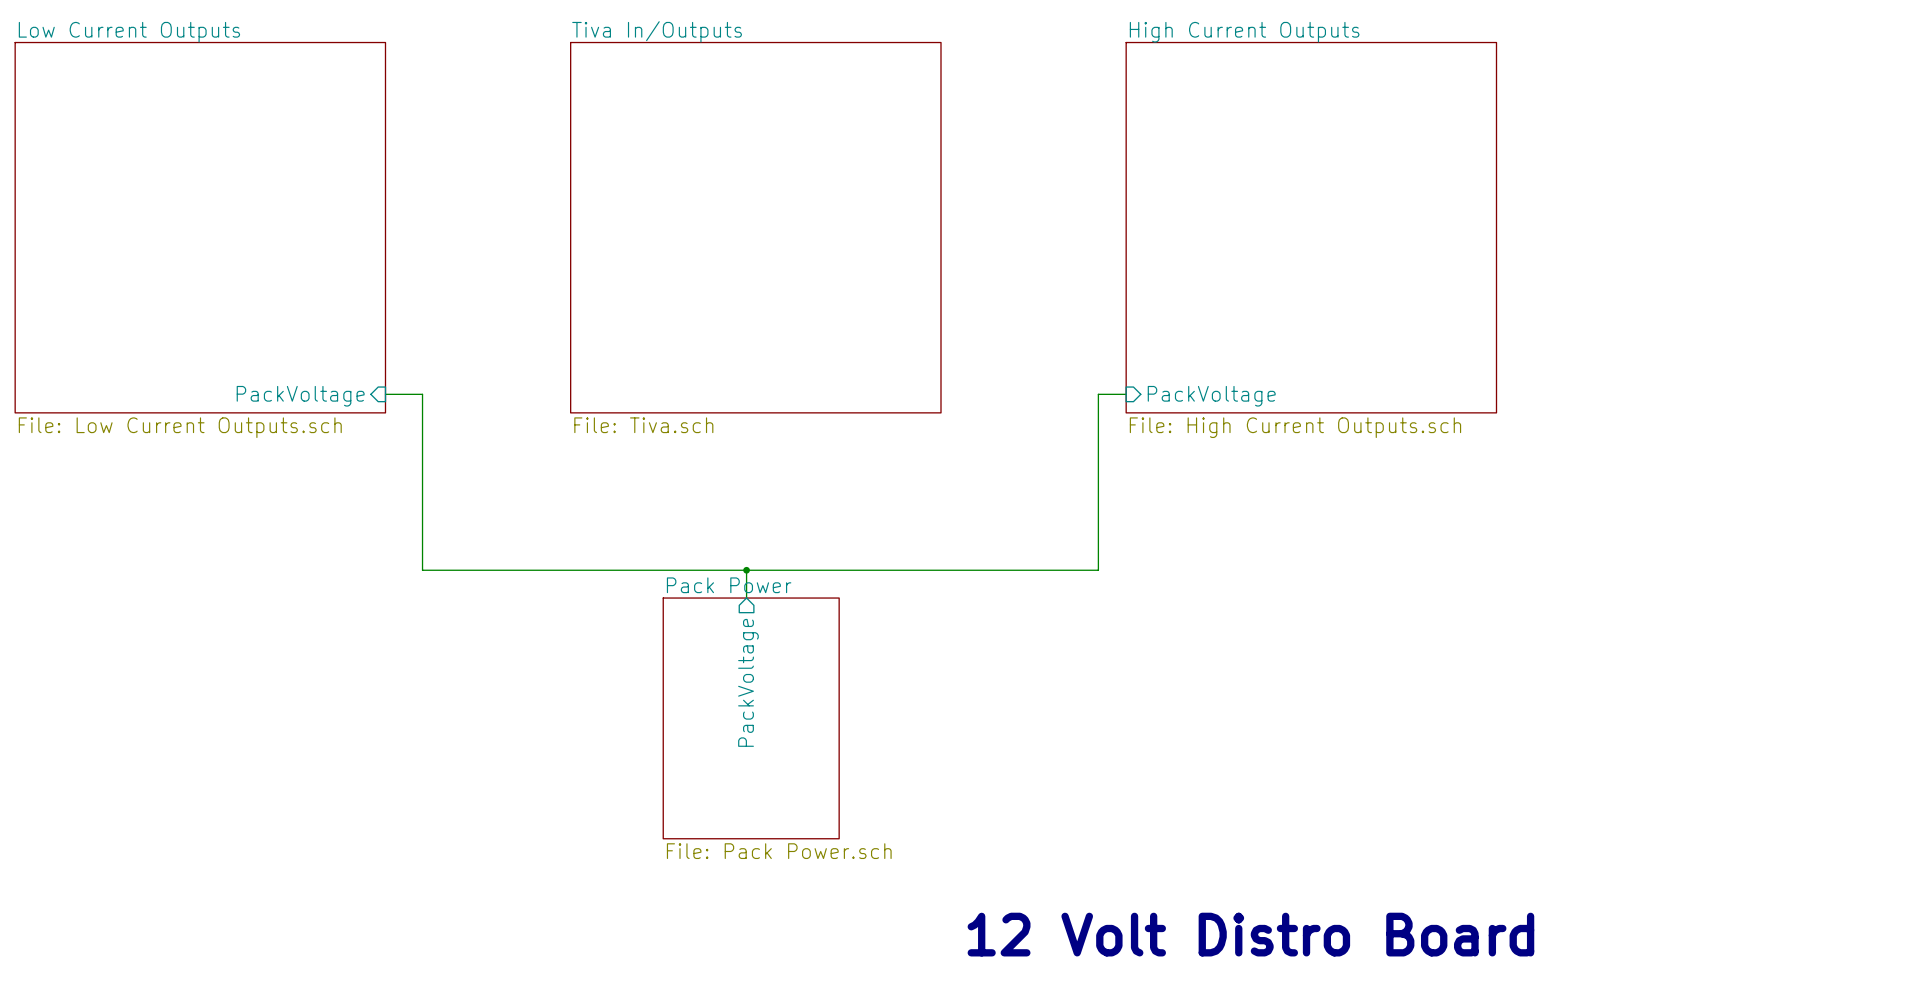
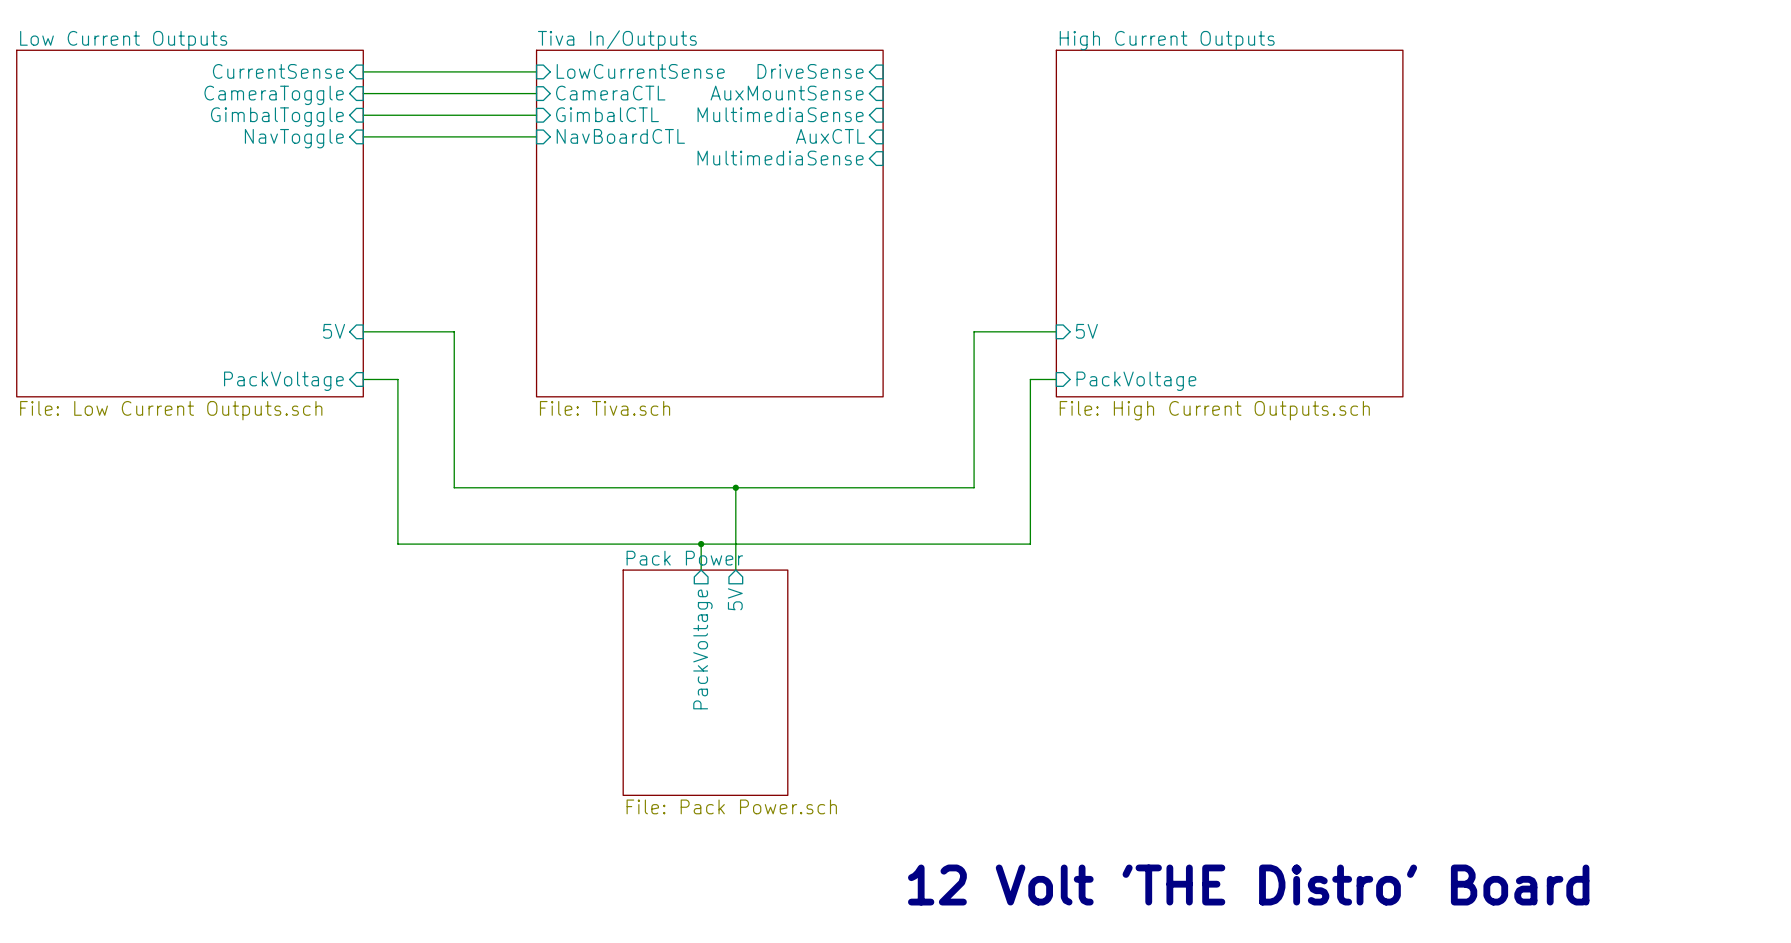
sheet pin: none -> CurrentSense (278, 71)
wire: none -> (363, 71) (536, 71)
sheet pin: none -> LowCurrentSense (640, 71)
sheet pin: none -> DriveSense (810, 71)
wire: none -> (363, 93) (536, 93)
sheet pin: none -> CameraCTL (610, 93)
sheet pin: none -> AuxMountSense (787, 93)
sheet pin: none -> CameraToggle (274, 95)
wire: none -> (363, 115) (536, 115)
sheet pin: none -> GimbalCTL (607, 114)
sheet pin: none -> MultimediaSense (780, 114)
sheet pin: none -> GimbalToggle (277, 117)
sheet pin: none -> NavBoardCTL (620, 136)
sheet pin: none -> AuxCTL (830, 136)
wire: none -> (363, 136) (536, 136)
sheet pin: none -> NavToggle (294, 138)
sheet pin: none -> MultimediaSense (780, 158)
sheet pin: none -> 5V (334, 331)
sheet pin: none -> 5V (1086, 331)
wire: none -> (363, 331) (454, 331) (454, 487) (974, 487) (974, 331) (1056, 331)
wire: none -> (735, 487) (735, 570)
junction: none -> (735, 487)
sheet pin: none -> 5V (735, 599)
text: 12 Volt Distro Board (1250, 934) -> 12 Volt 'THE Distro' Board (1248, 885)

